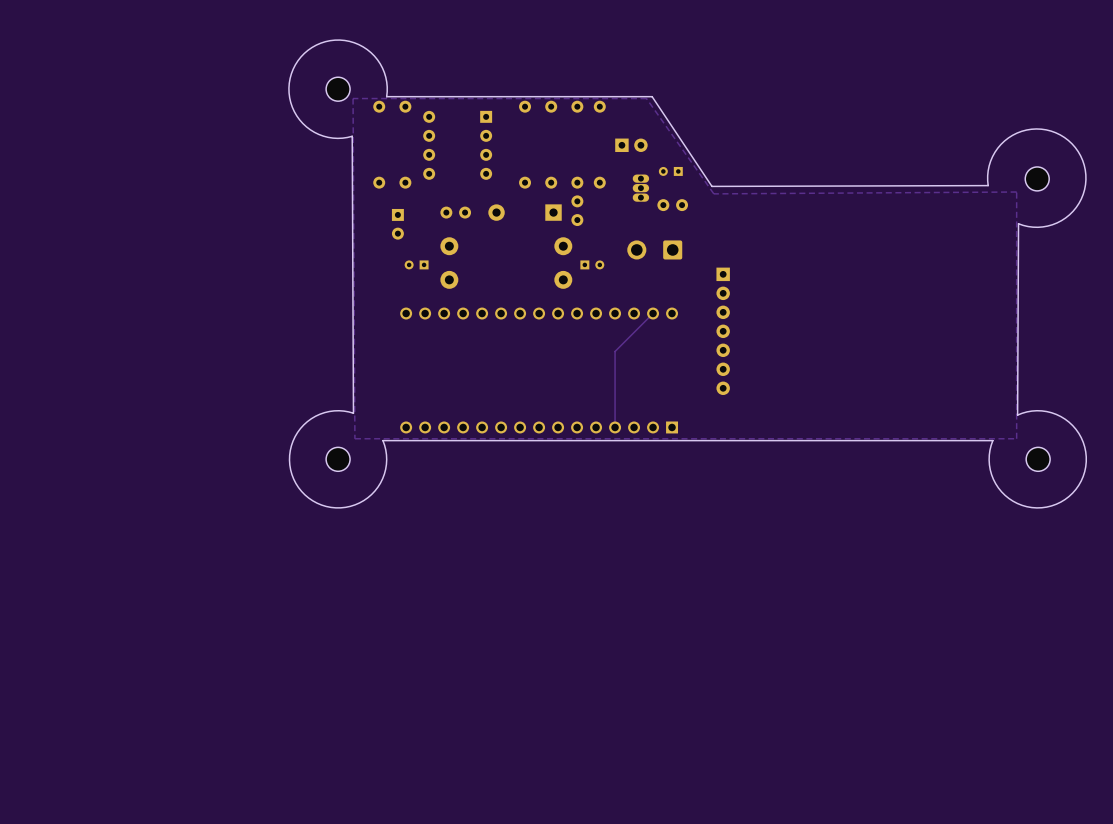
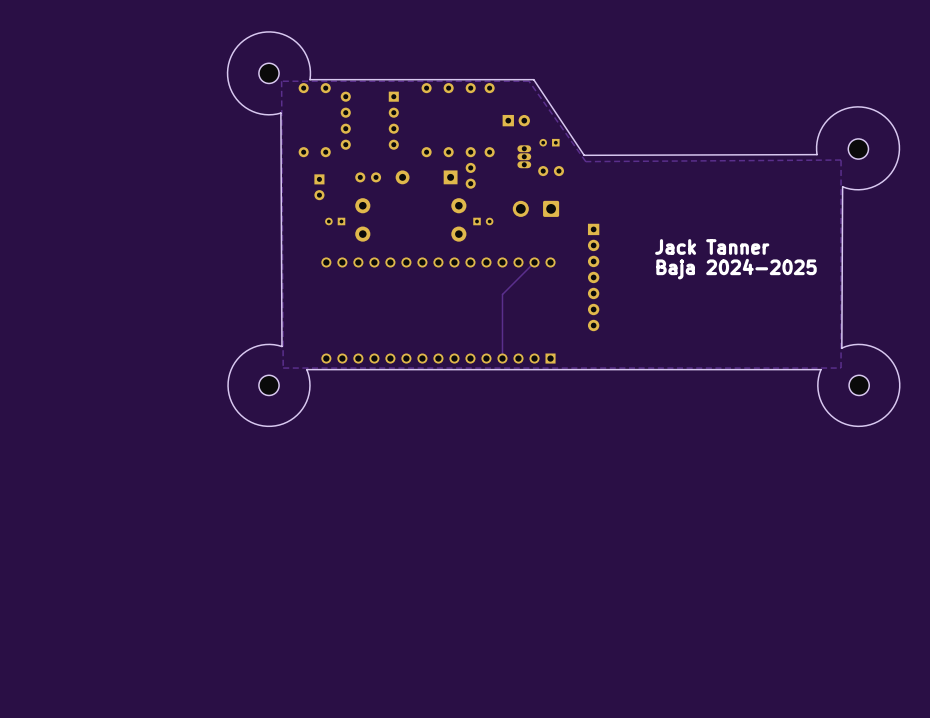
text: none -> Jack Tanner (712, 246)
text: none -> Baja 2024-2025 (736, 269)

